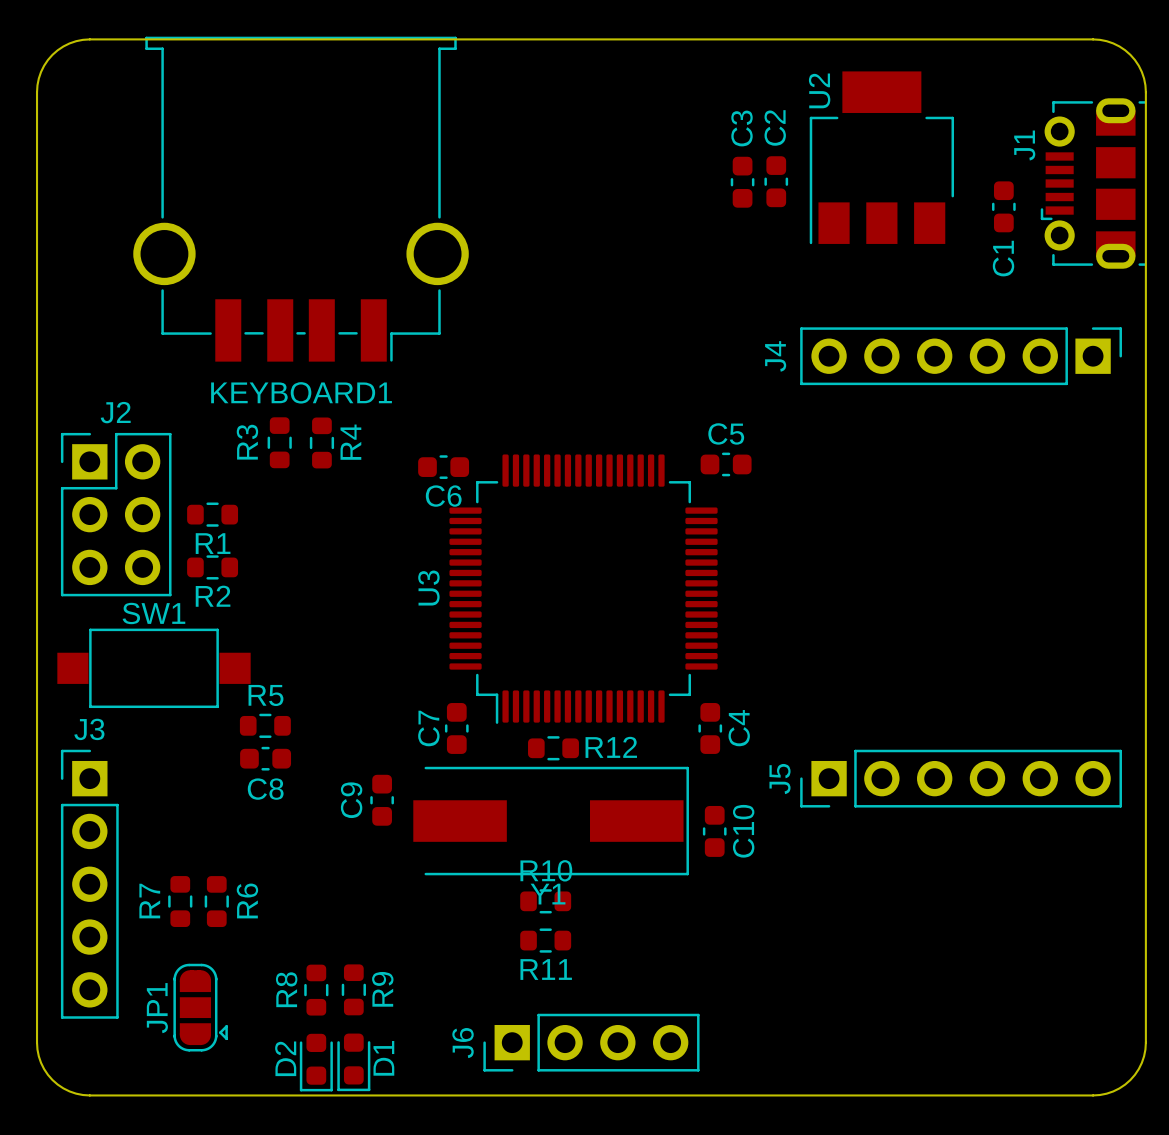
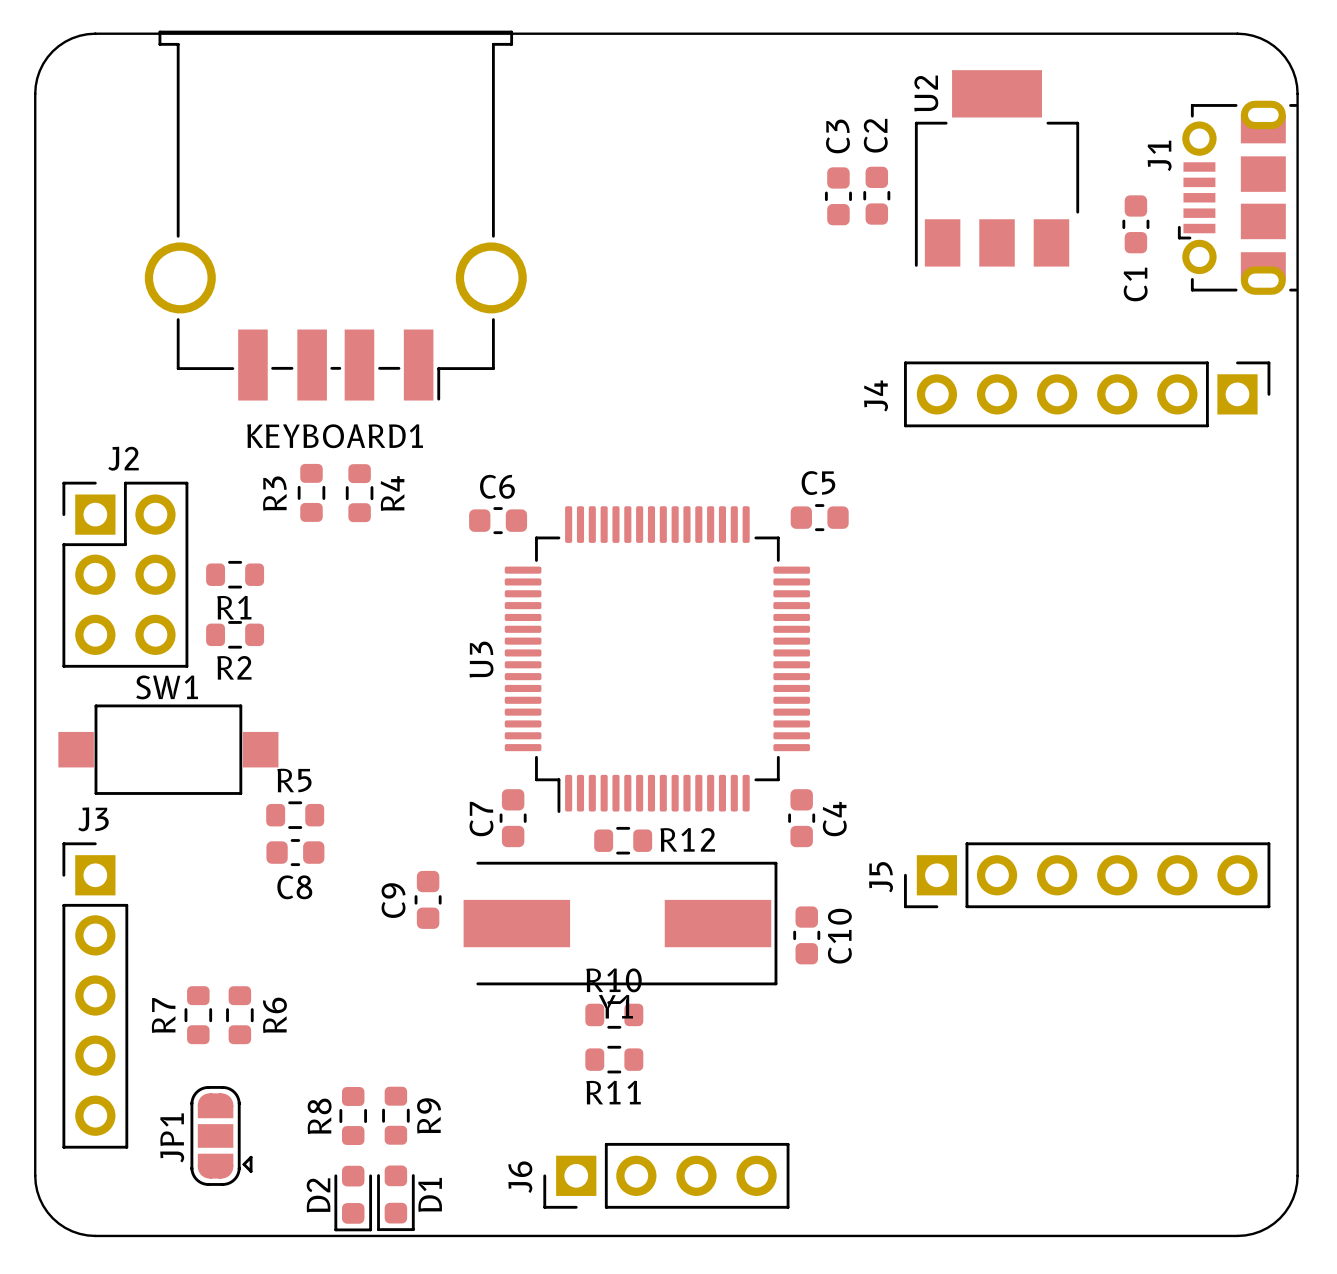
C6 name position: C6 (443, 496) -> C6 (497, 486)

